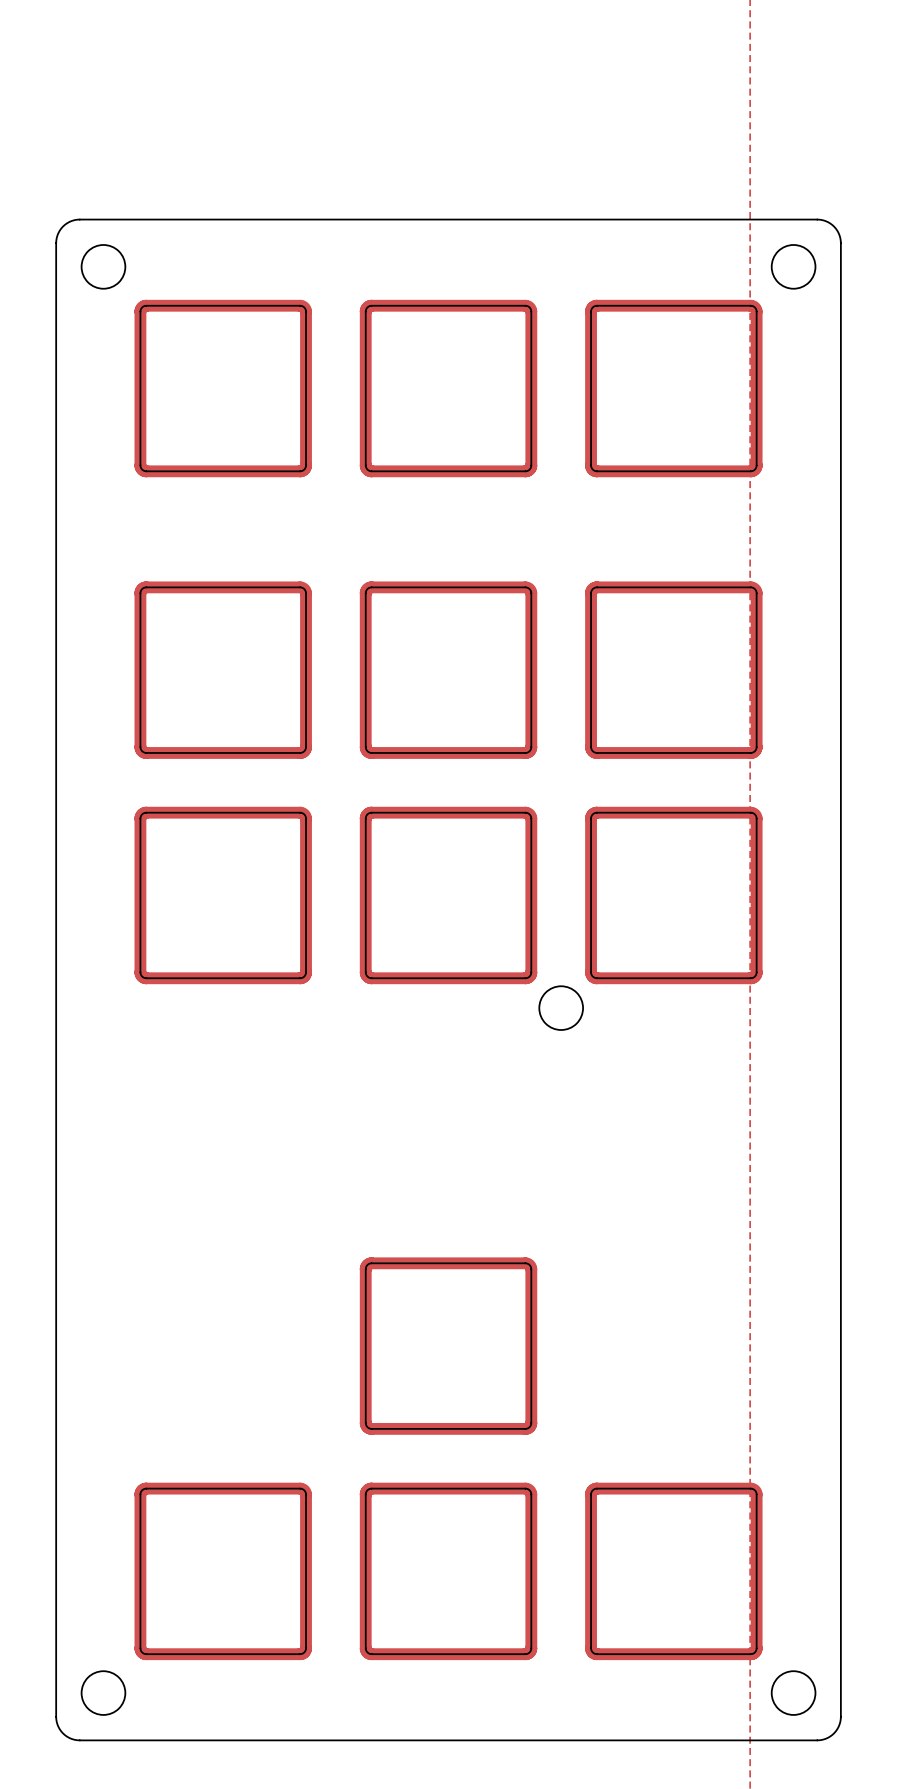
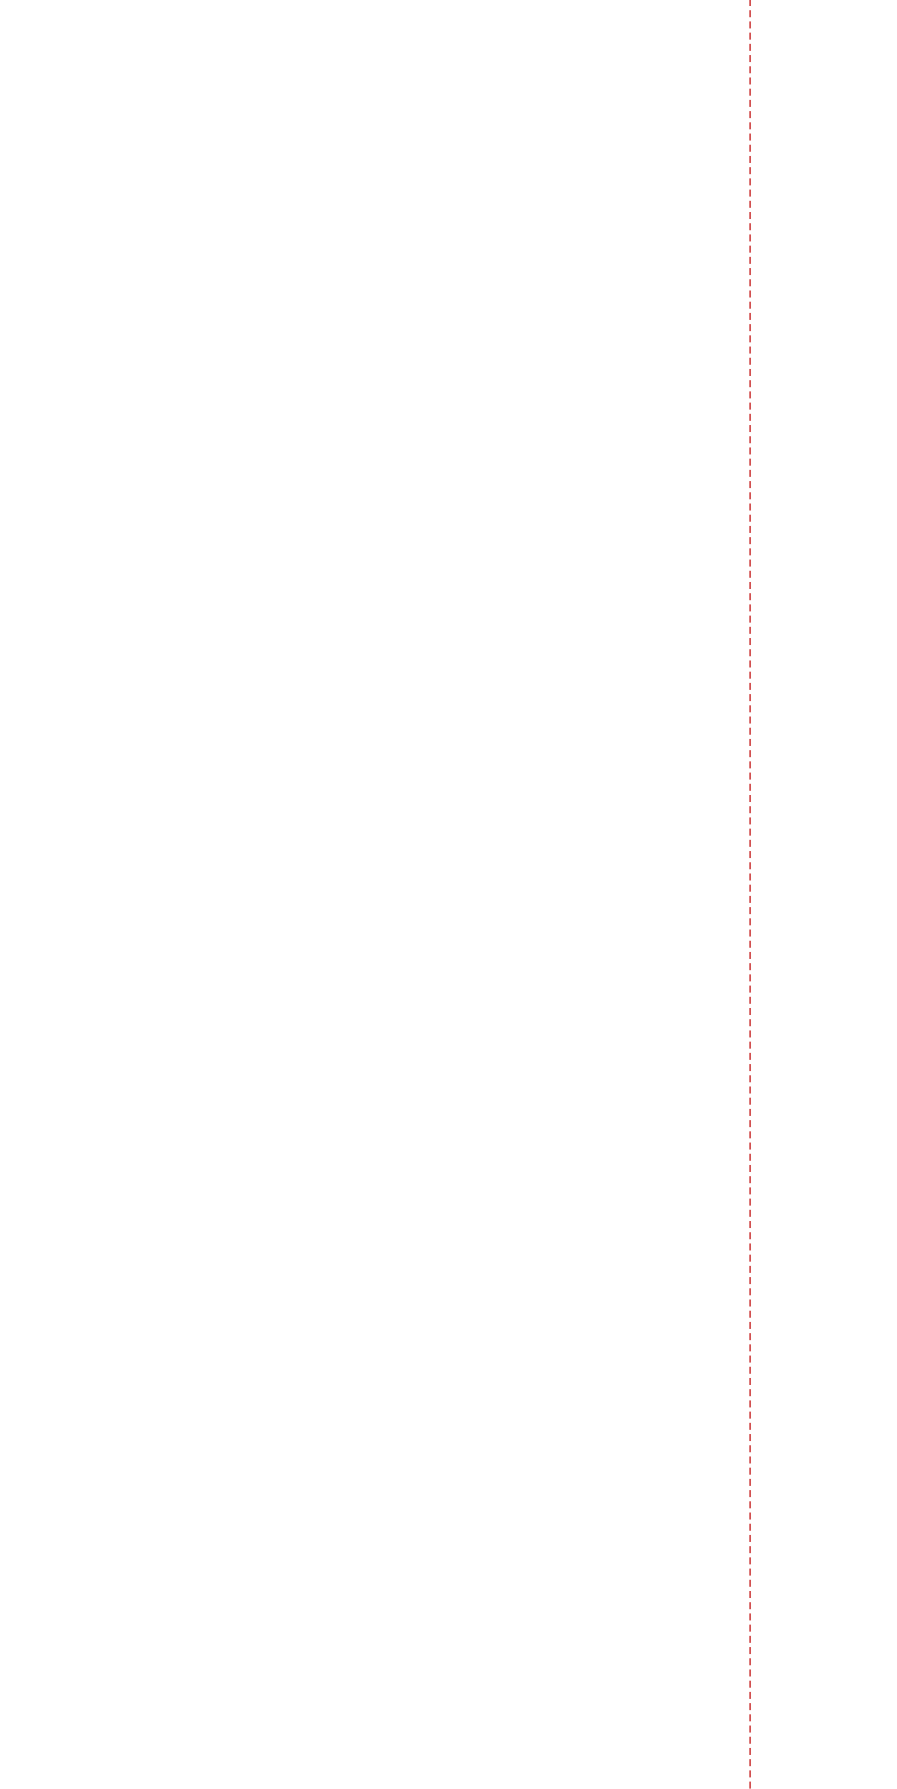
board edge: (79, 219) (817, 219) (829, 223) (838, 232) (840, 243) (840, 1716) (837, 1729) (827, 1738) (817, 1740) (79, 1740) (67, 1736) (58, 1726) (56, 1716) (56, 243) (57, 235) (63, 226) (69, 221) (79, 219) -> none
round board edge: [80, 244, 127, 290] -> none
round board edge: [770, 244, 817, 290] -> none
drawing: [134, 299, 312, 478] -> none
drawing: [359, 299, 538, 478] -> none
drawing: [585, 299, 763, 478] -> none
drawing: [134, 581, 312, 759] -> none
drawing: [359, 581, 538, 759] -> none
drawing: [585, 581, 763, 759] -> none
drawing: [134, 806, 312, 985] -> none
drawing: [359, 806, 538, 985] -> none
drawing: [585, 806, 763, 985] -> none
round board edge: [538, 985, 584, 1031] -> none
drawing: [359, 1257, 538, 1435] -> none
drawing: [134, 1482, 312, 1661] -> none
drawing: [359, 1482, 538, 1661] -> none
drawing: [585, 1482, 763, 1661] -> none
round board edge: [80, 1670, 127, 1716] -> none
round board edge: [770, 1670, 817, 1716] -> none

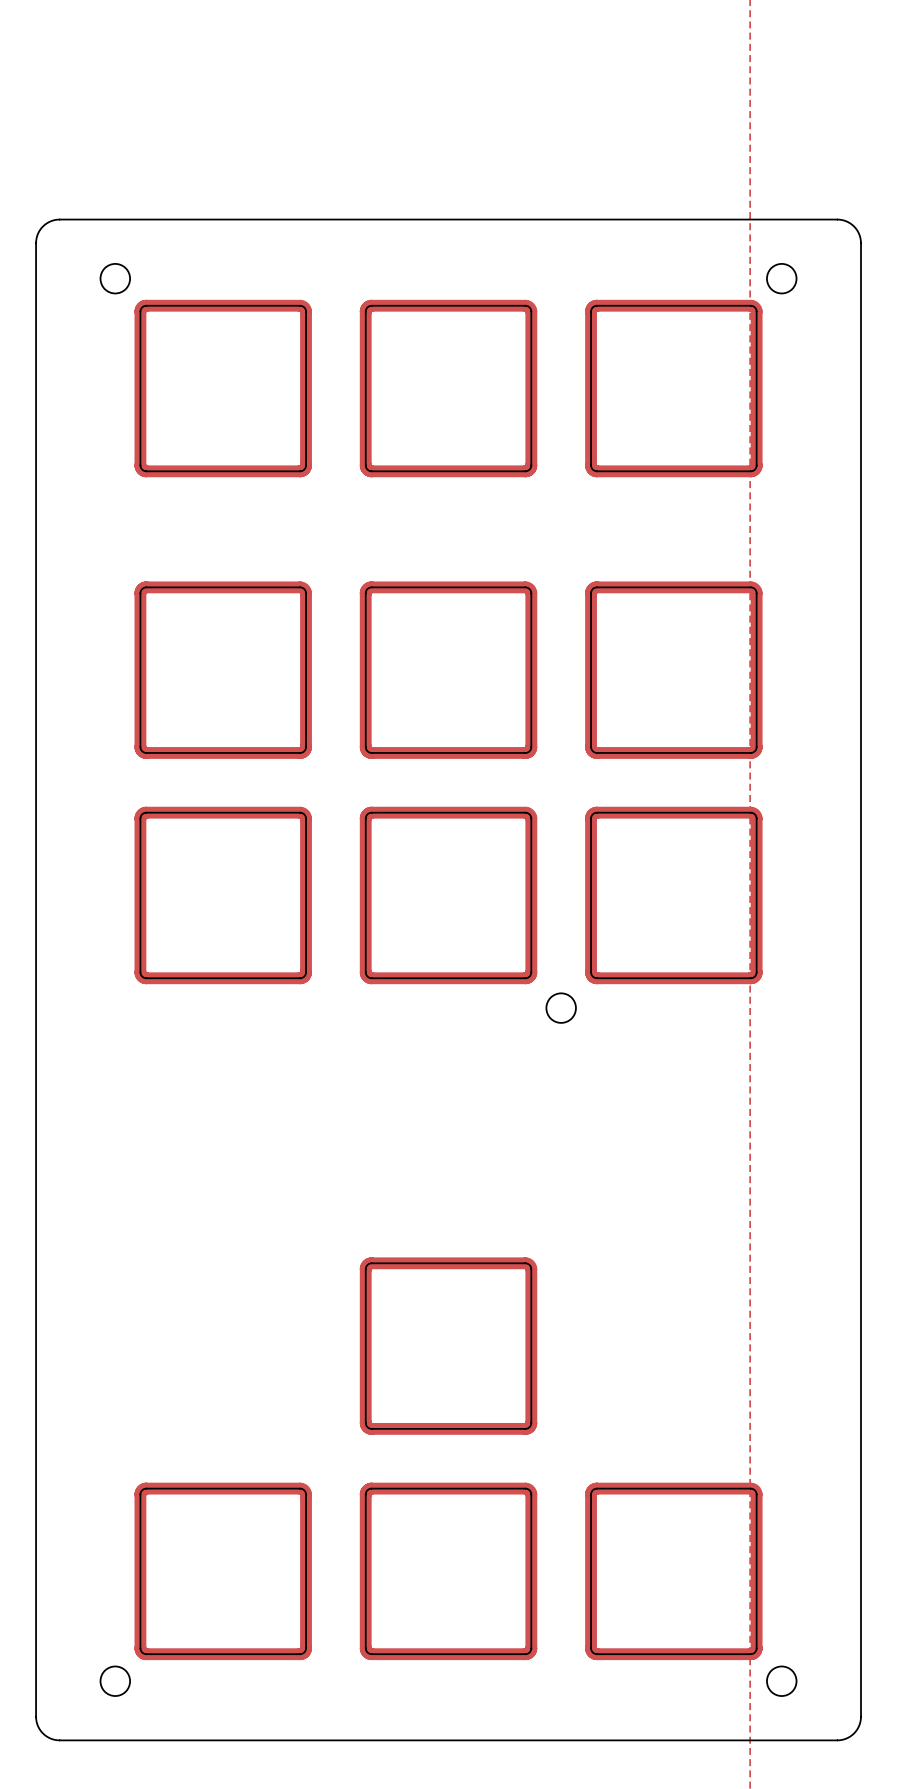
board edge: none -> (59, 219) (837, 219) (849, 223) (858, 232) (861, 243) (861, 1716) (857, 1729) (847, 1738) (837, 1740) (59, 1740) (47, 1736) (38, 1726) (36, 1716) (36, 243) (38, 232) (42, 226) (49, 221) (59, 219)
round board edge: none -> [99, 263, 131, 295]
round board edge: none -> [766, 263, 798, 295]
drawing: none -> [134, 299, 312, 478]
drawing: none -> [359, 299, 538, 478]
drawing: none -> [585, 299, 763, 478]
drawing: none -> [134, 581, 312, 759]
drawing: none -> [359, 581, 538, 759]
drawing: none -> [585, 581, 763, 759]
drawing: none -> [134, 806, 312, 985]
drawing: none -> [359, 806, 538, 985]
drawing: none -> [585, 806, 763, 985]
round board edge: none -> [545, 992, 577, 1024]
drawing: none -> [359, 1257, 538, 1435]
drawing: none -> [134, 1482, 312, 1661]
drawing: none -> [359, 1482, 538, 1661]
drawing: none -> [585, 1482, 763, 1661]
round board edge: none -> [99, 1665, 131, 1697]
round board edge: none -> [766, 1665, 798, 1697]

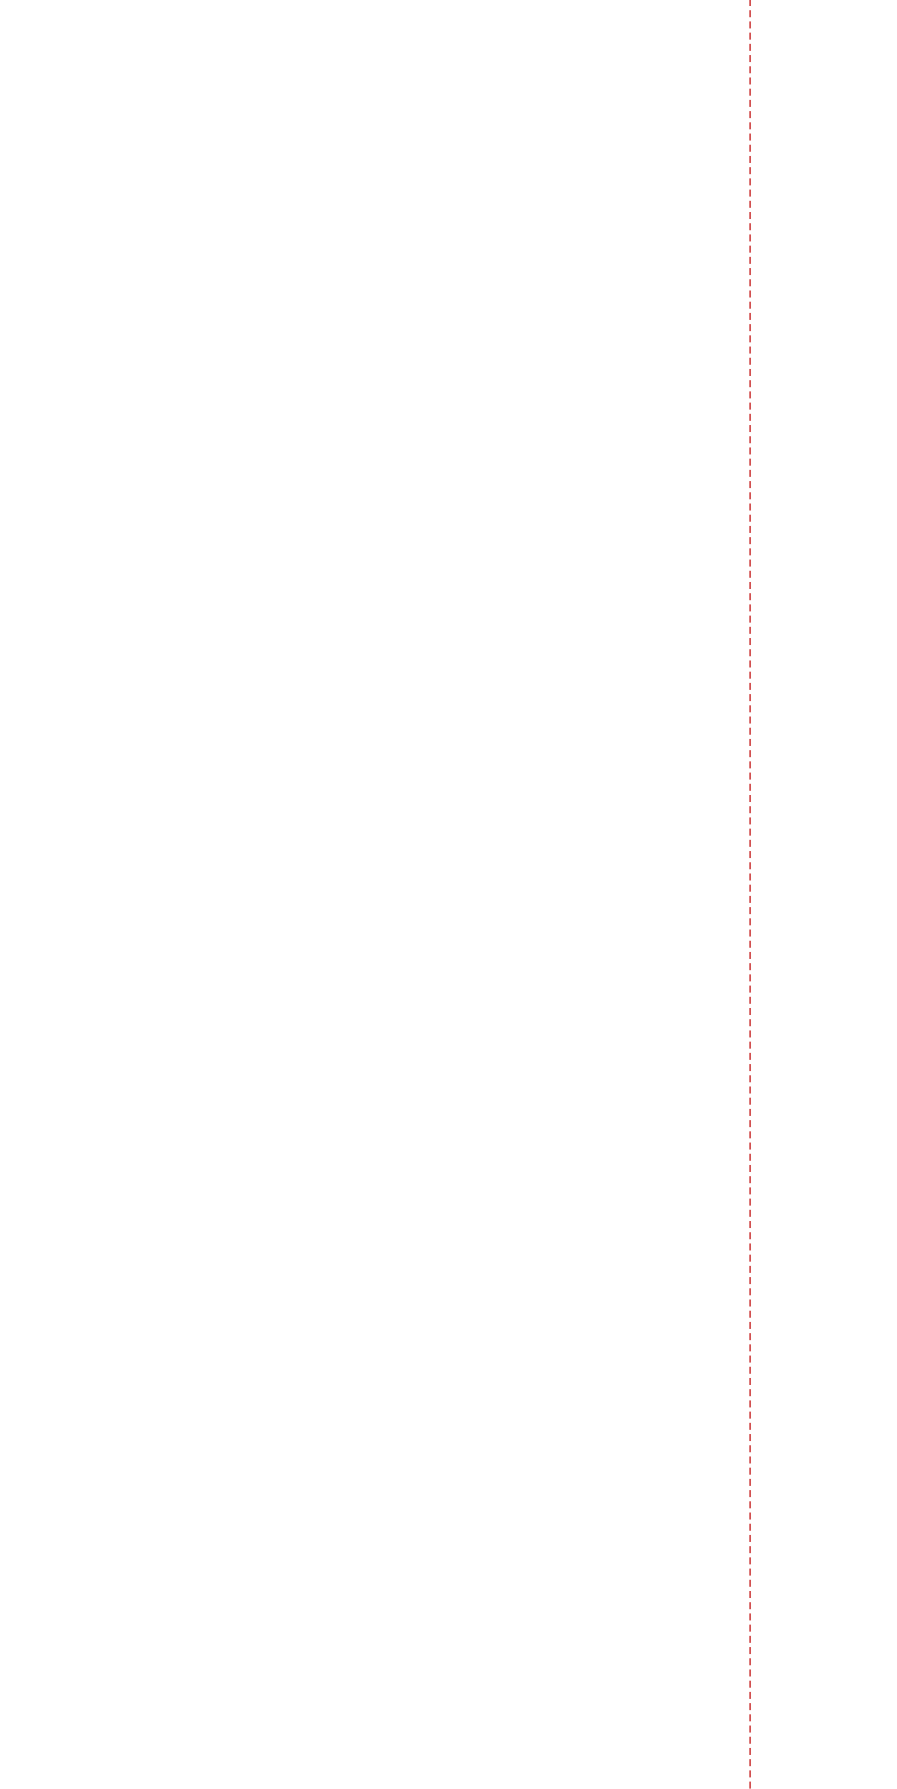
board edge: (59, 219) (837, 219) (849, 223) (858, 232) (861, 243) (861, 1716) (857, 1729) (847, 1738) (837, 1740) (59, 1740) (47, 1736) (38, 1726) (36, 1716) (36, 243) (38, 232) (42, 226) (49, 221) (59, 219) -> none
round board edge: [99, 263, 131, 295] -> none
round board edge: [766, 263, 798, 295] -> none
drawing: [134, 299, 312, 478] -> none
drawing: [359, 299, 538, 478] -> none
drawing: [585, 299, 763, 478] -> none
drawing: [134, 581, 312, 759] -> none
drawing: [359, 581, 538, 759] -> none
drawing: [585, 581, 763, 759] -> none
drawing: [134, 806, 312, 985] -> none
drawing: [359, 806, 538, 985] -> none
drawing: [585, 806, 763, 985] -> none
round board edge: [545, 992, 577, 1024] -> none
drawing: [359, 1257, 538, 1435] -> none
drawing: [134, 1482, 312, 1661] -> none
drawing: [359, 1482, 538, 1661] -> none
drawing: [585, 1482, 763, 1661] -> none
round board edge: [99, 1665, 131, 1697] -> none
round board edge: [766, 1665, 798, 1697] -> none

